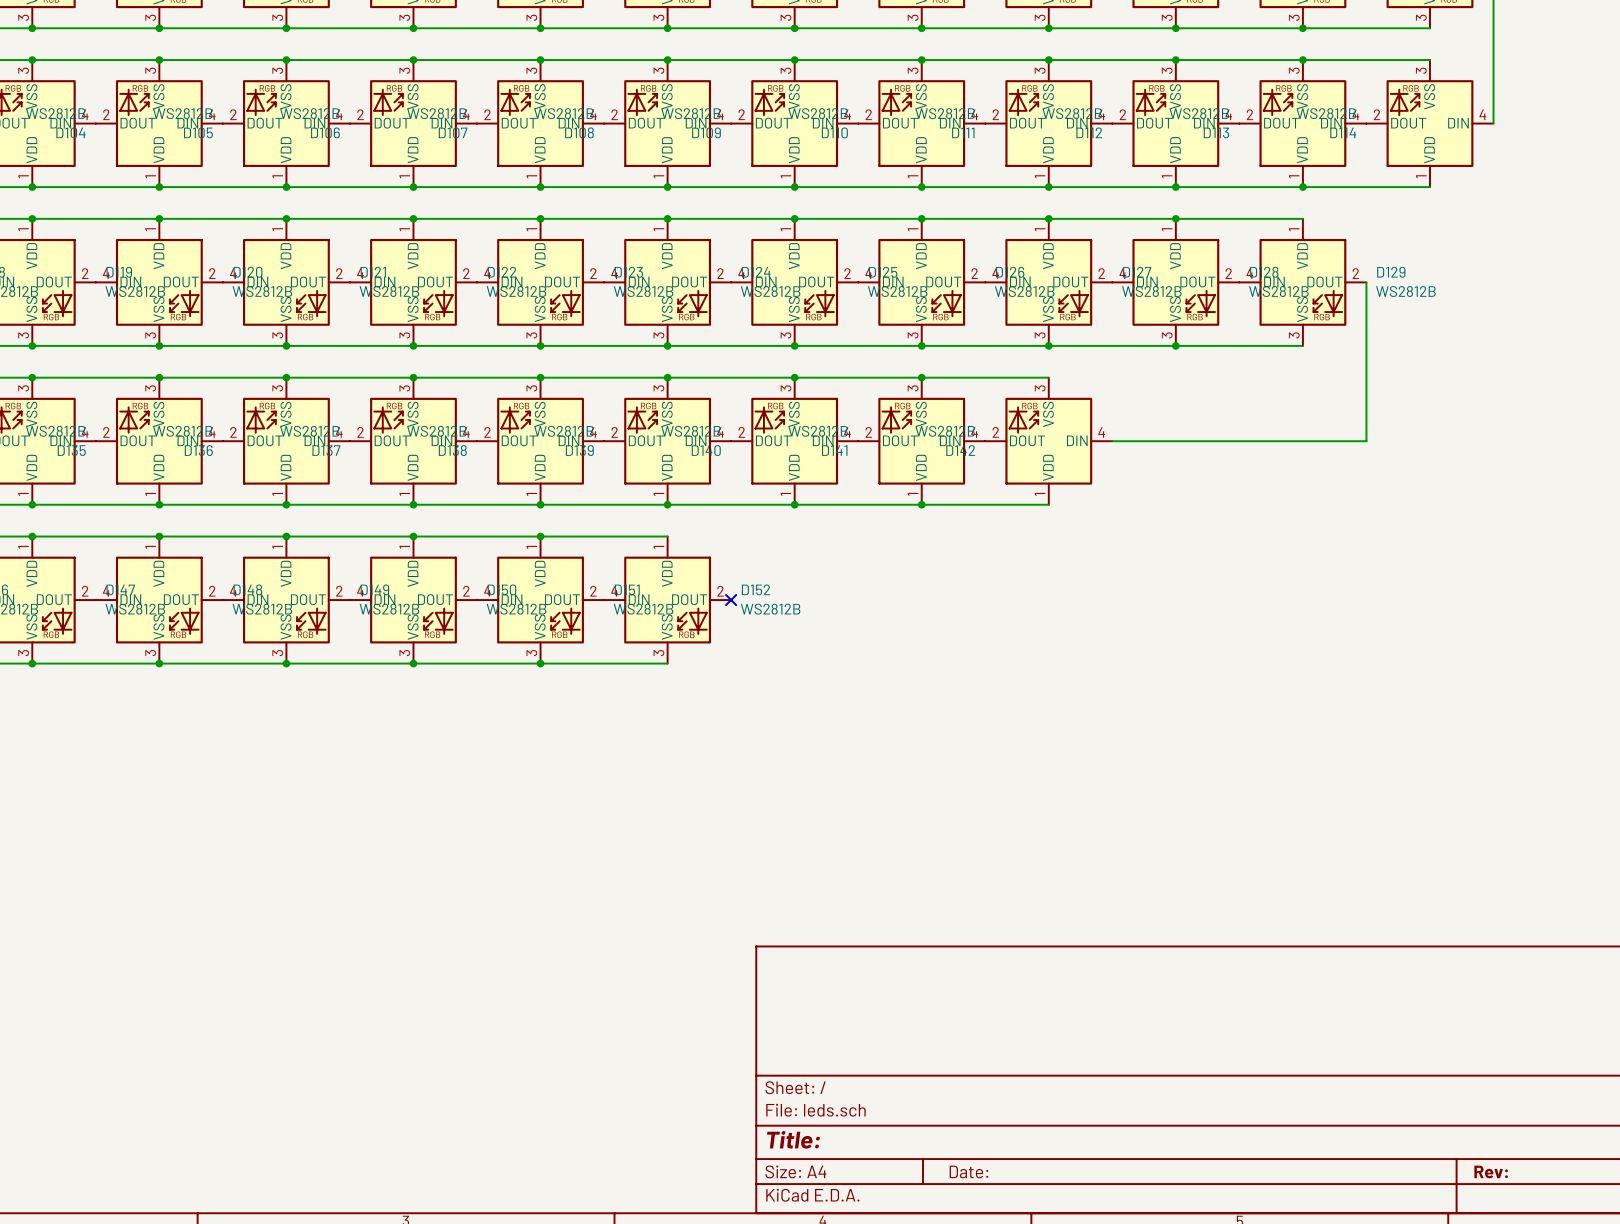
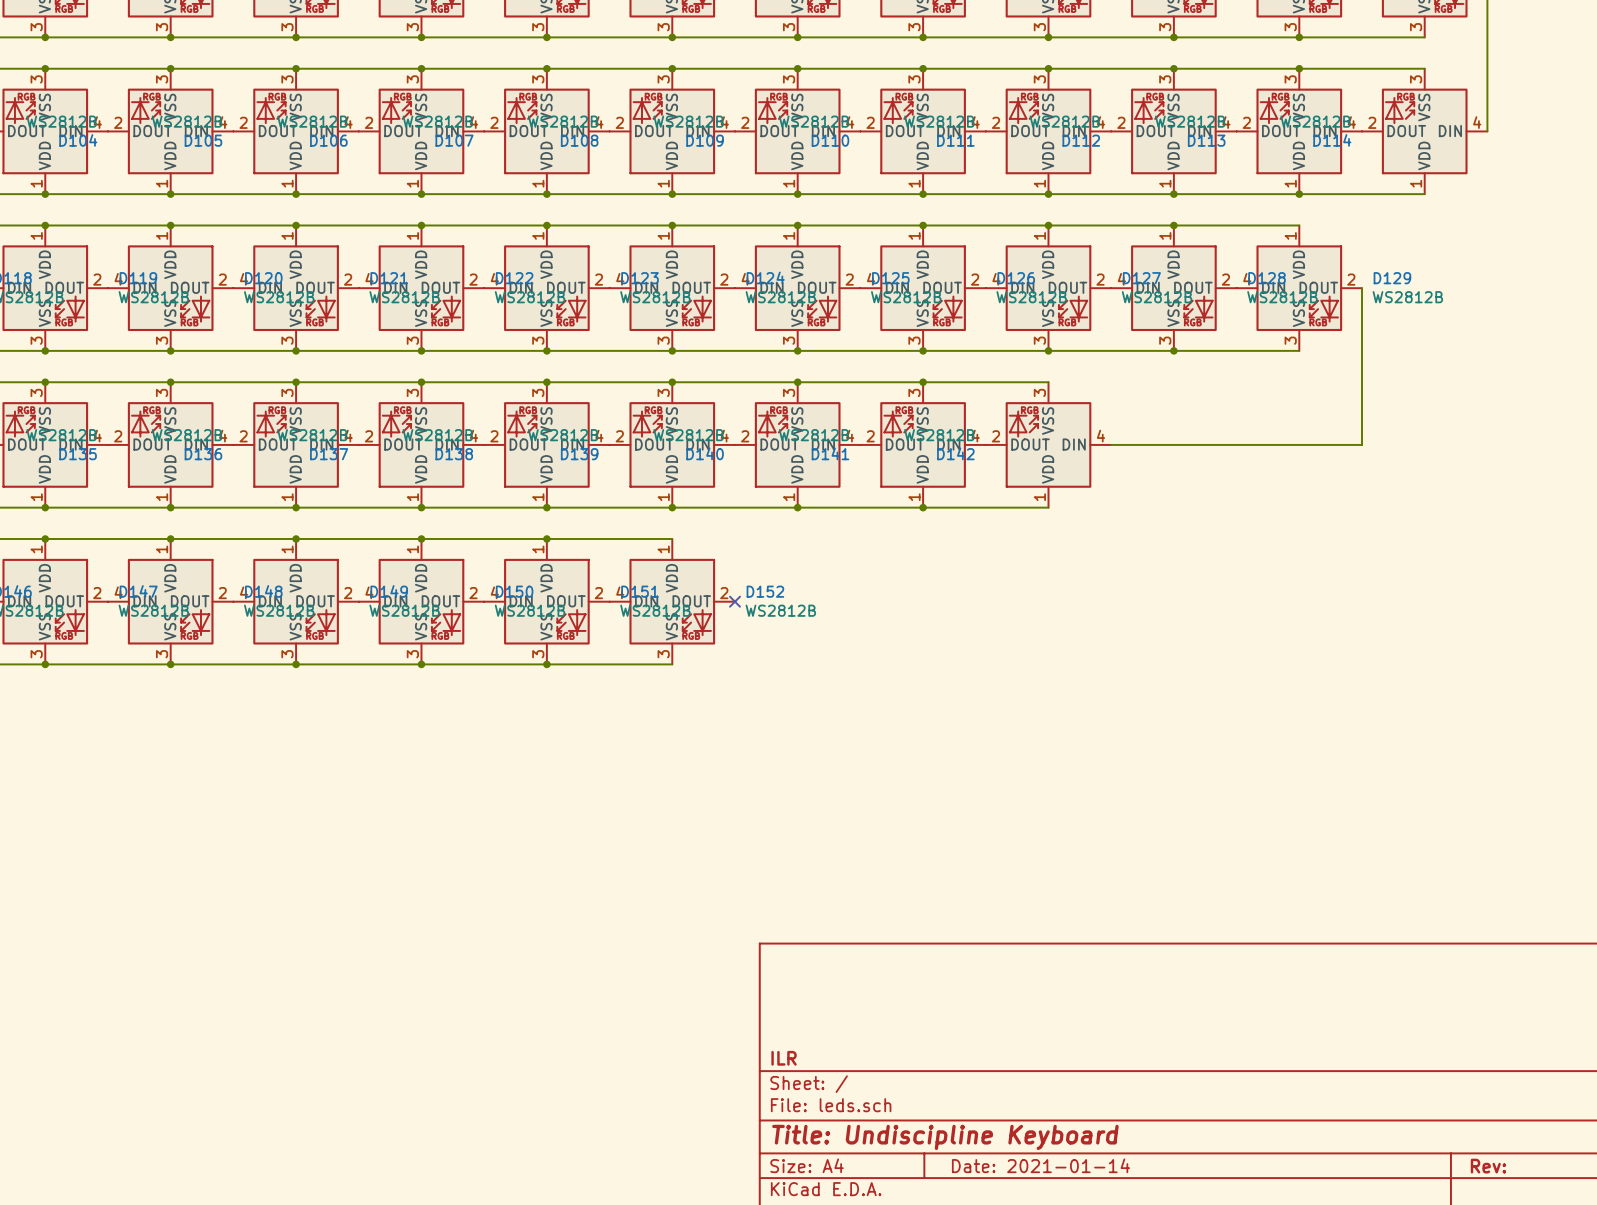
title block: none -> ILR (784, 1058)
title block: Title: (793, 1139) -> Title: Undiscipline Keyboard (945, 1137)
title block: Date: (968, 1171) -> Date: 2021-01-14 (1040, 1165)

